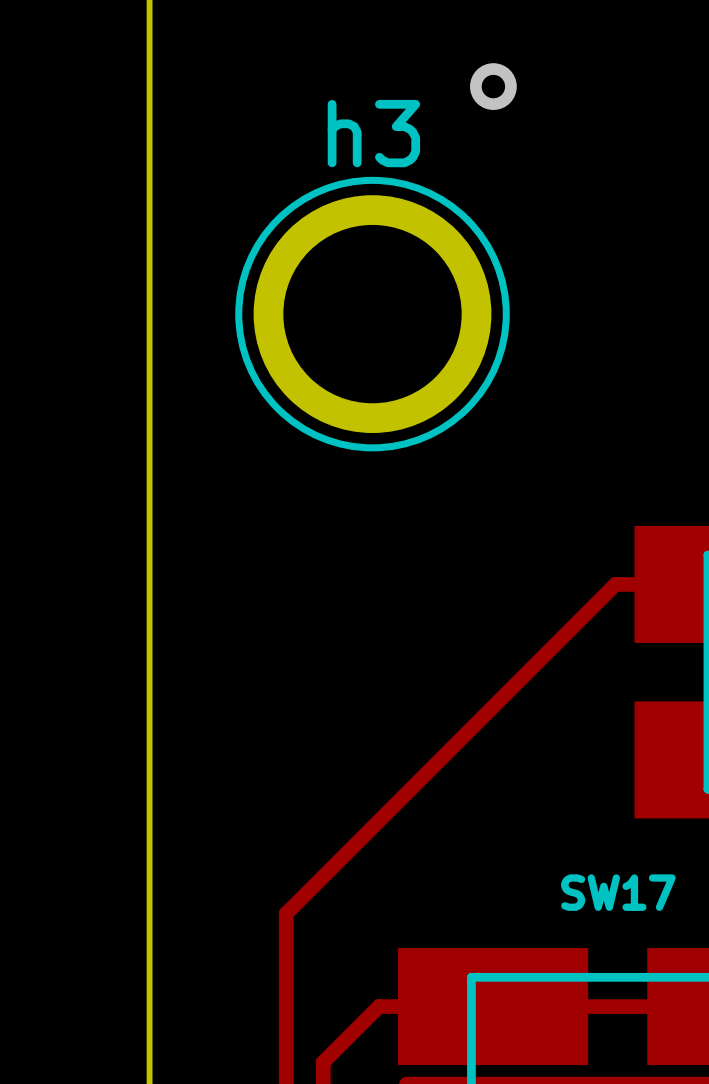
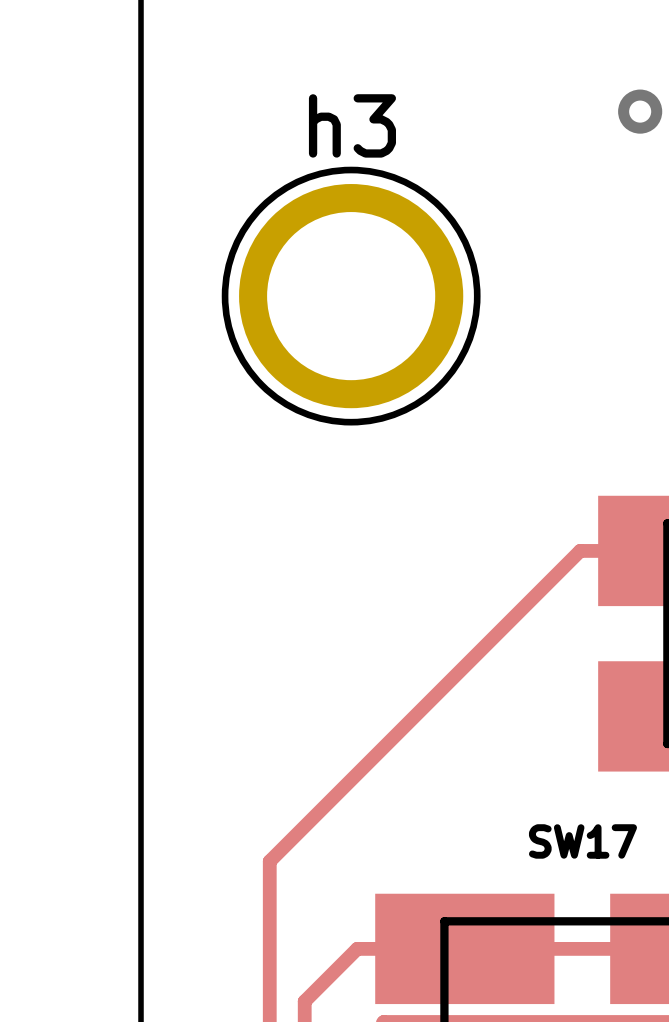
via position: (493, 86) -> (640, 111)

